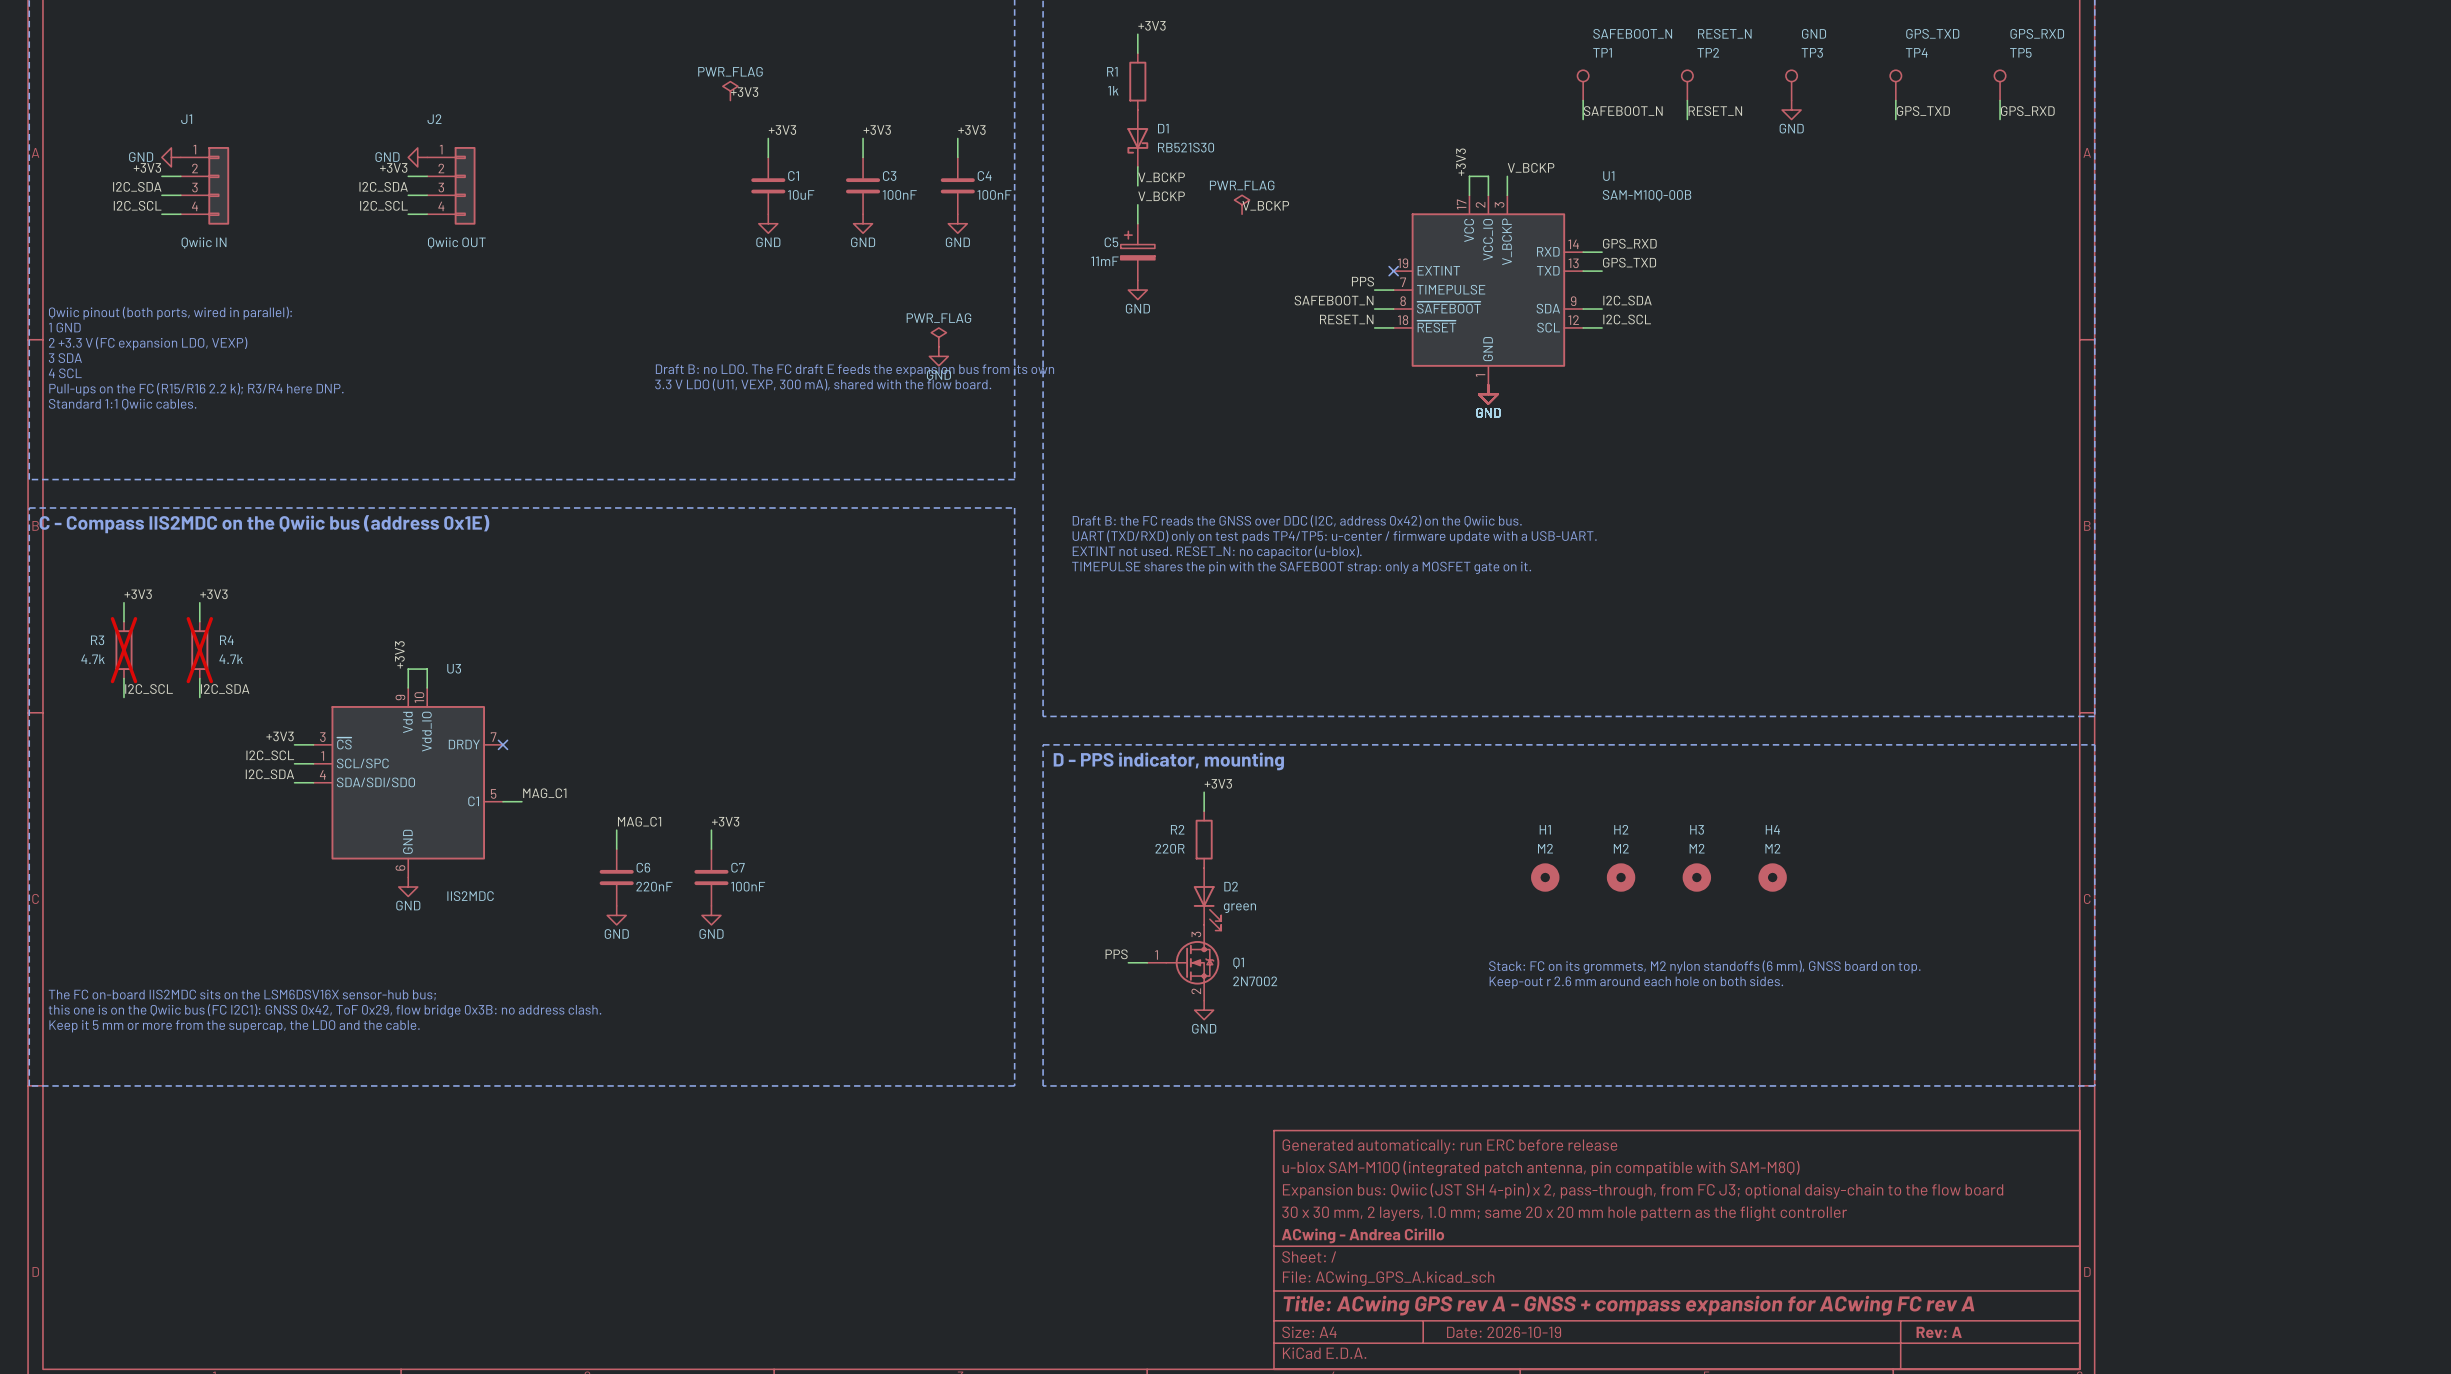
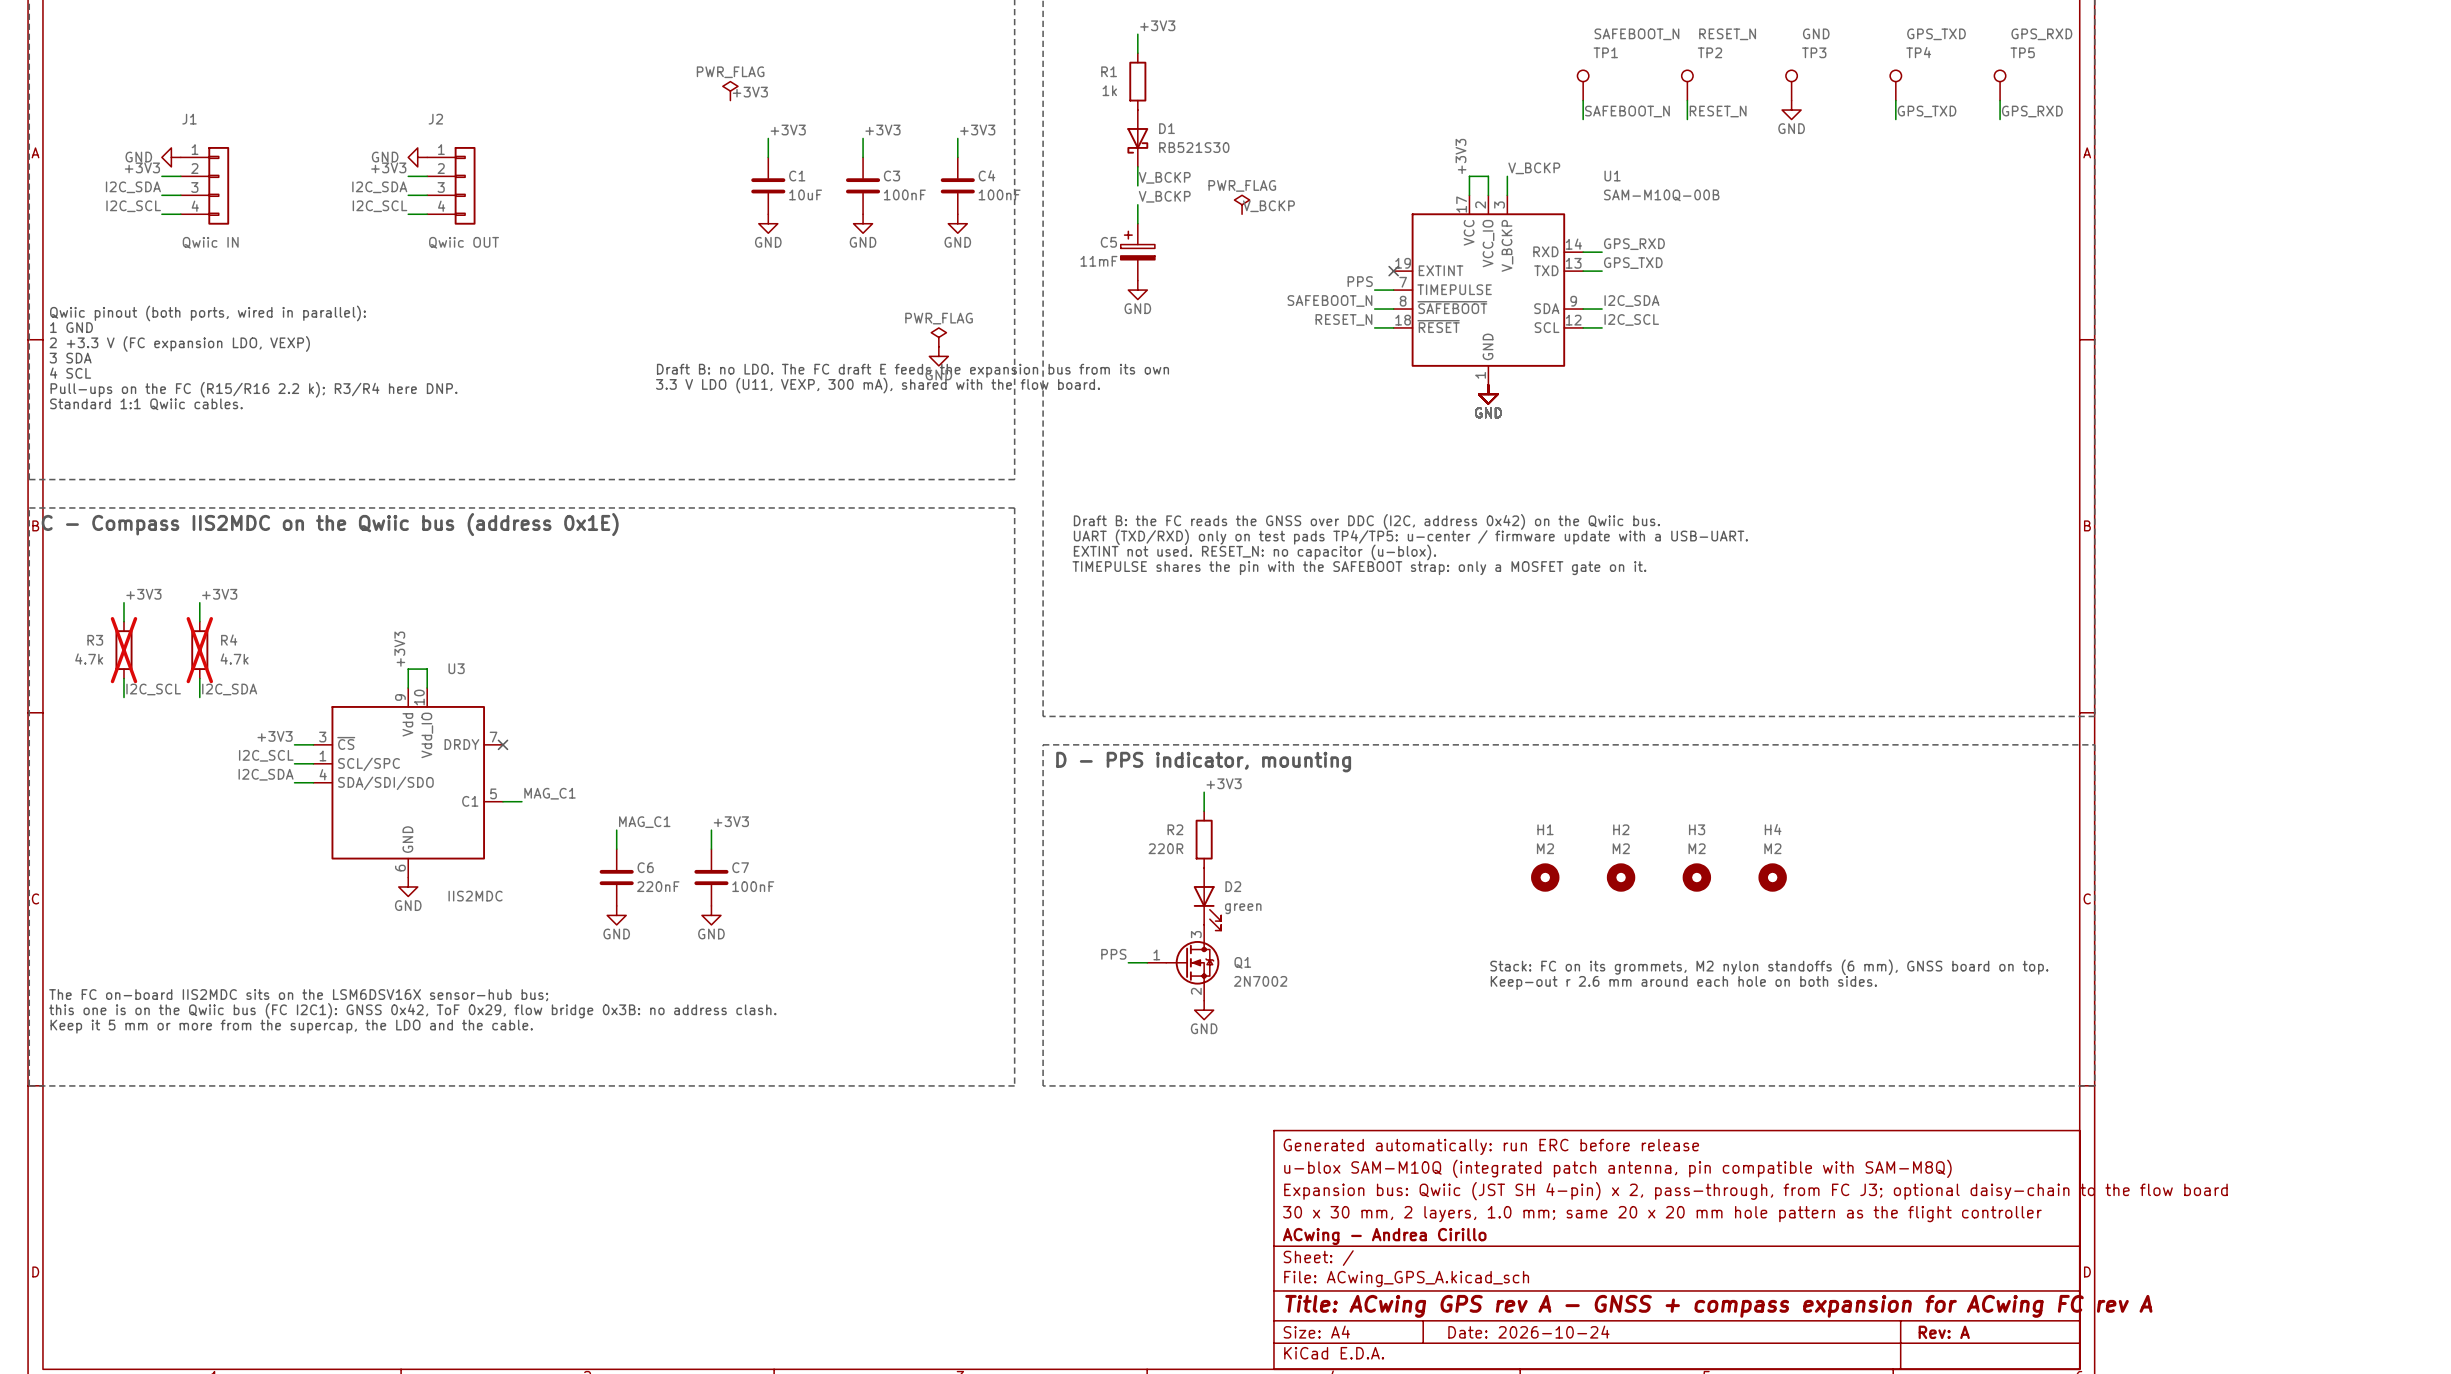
title block: Date: 2026-10-19 (1504, 1332) -> Date: 2026-10-24 (1528, 1332)

